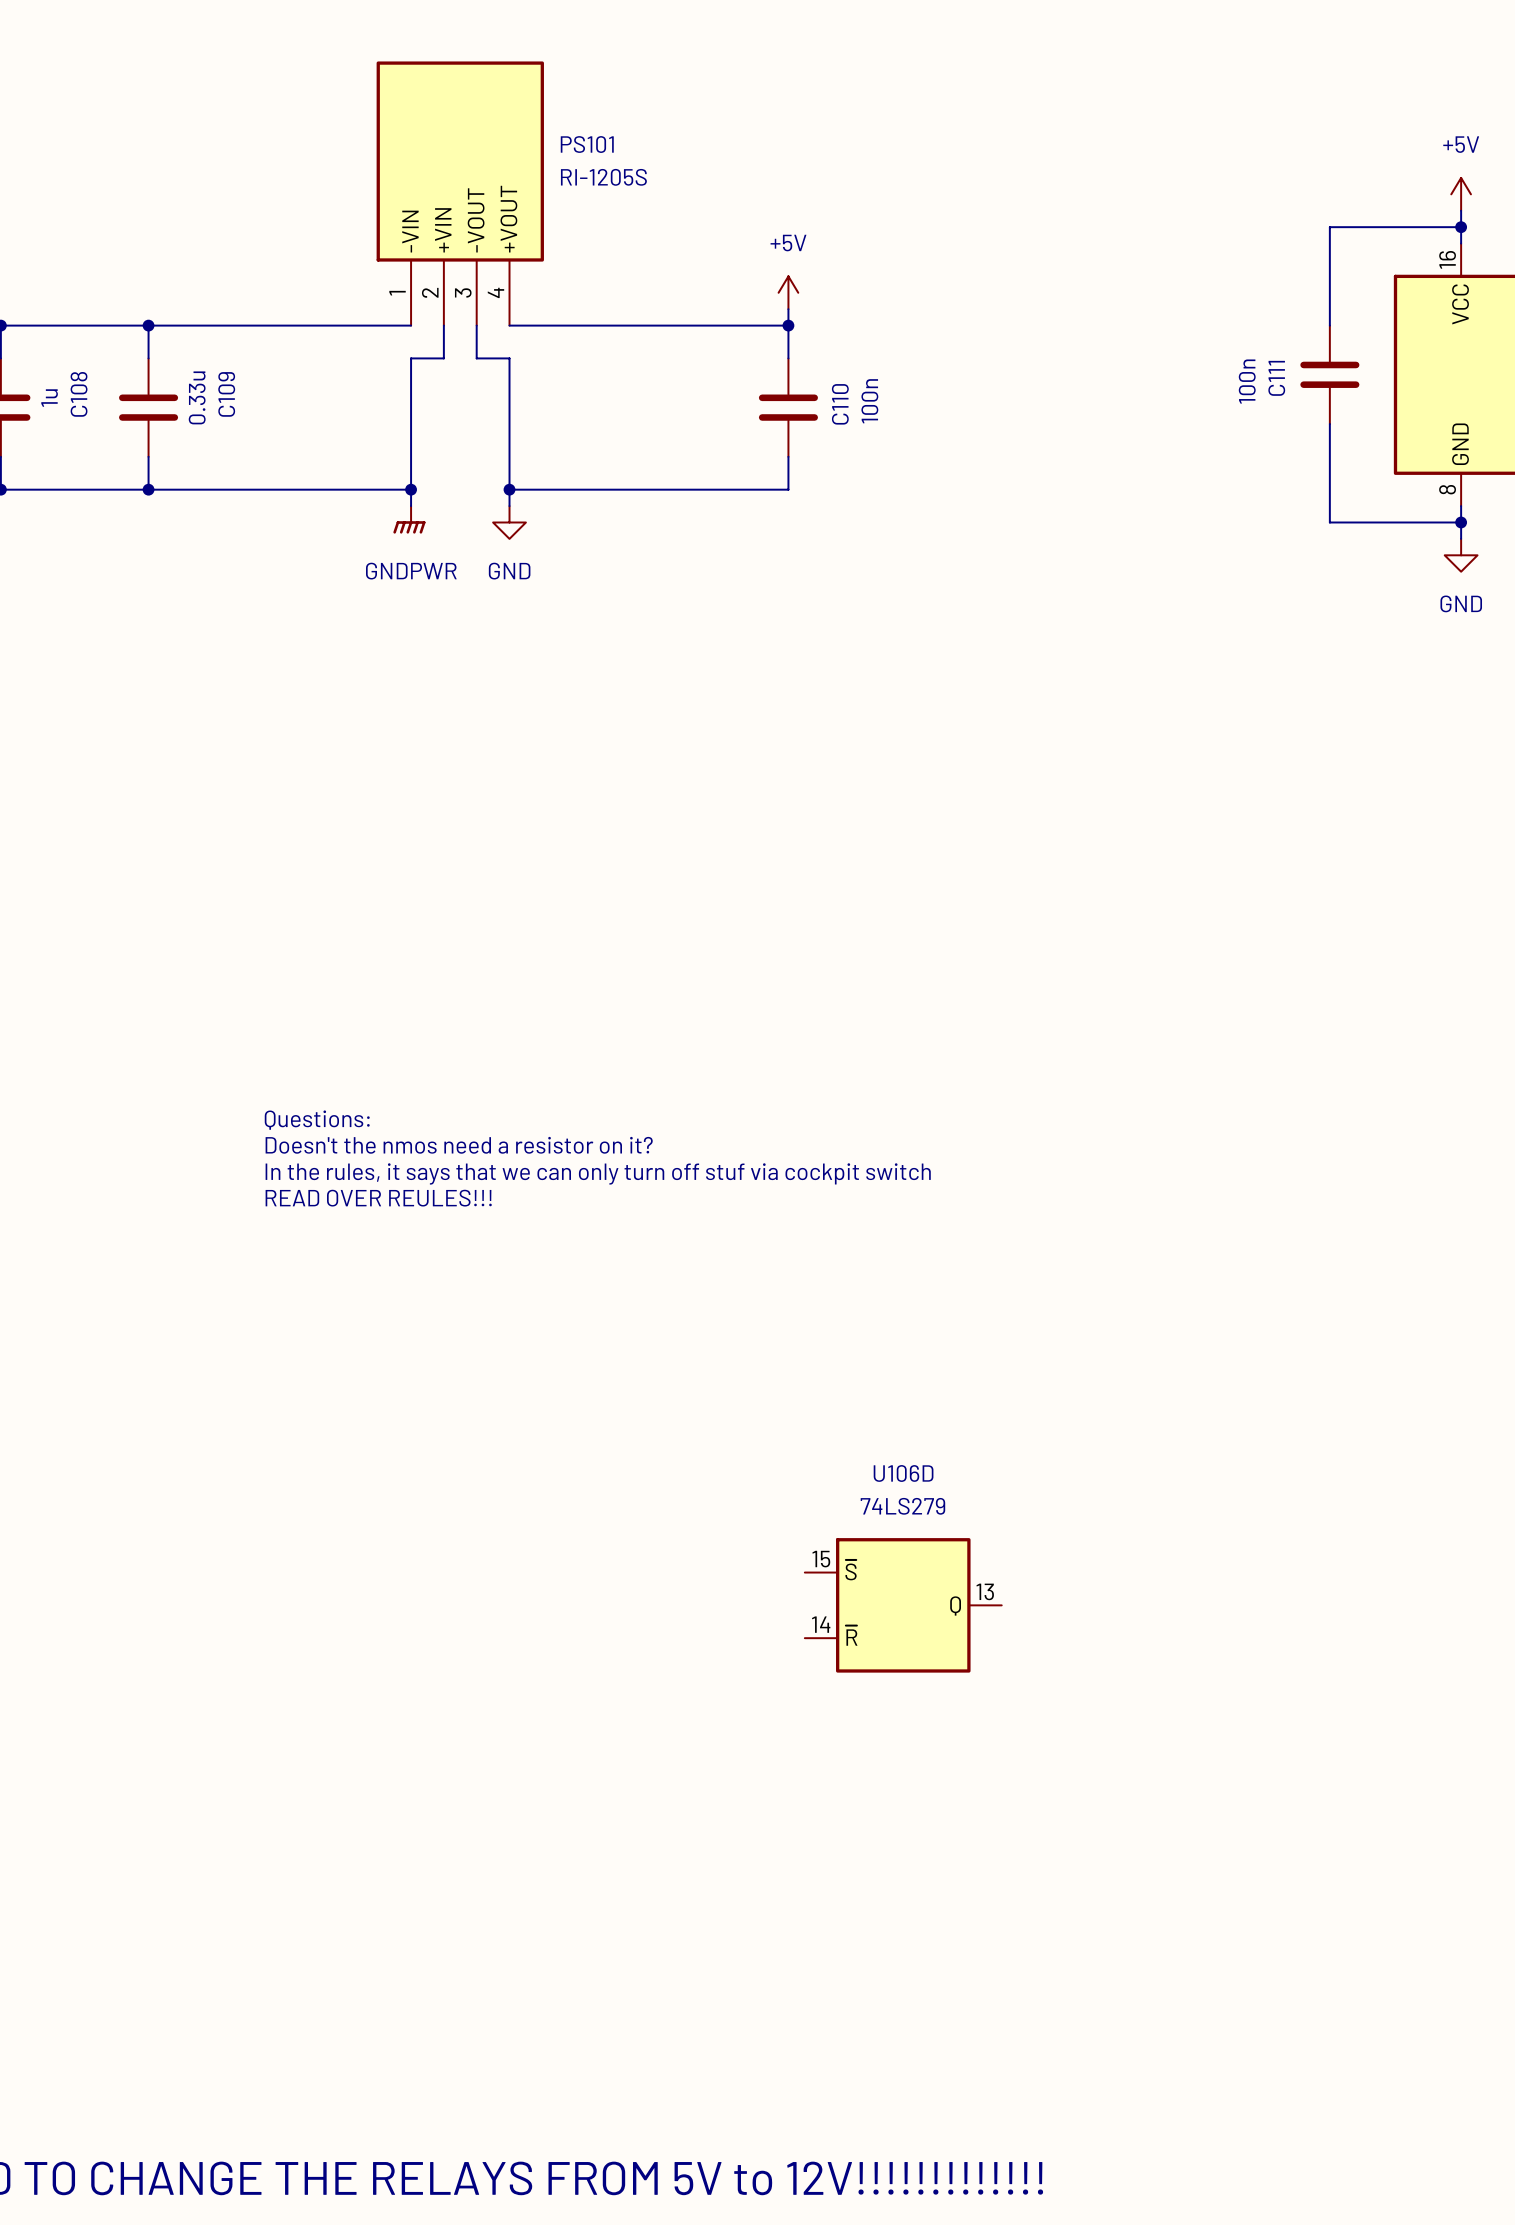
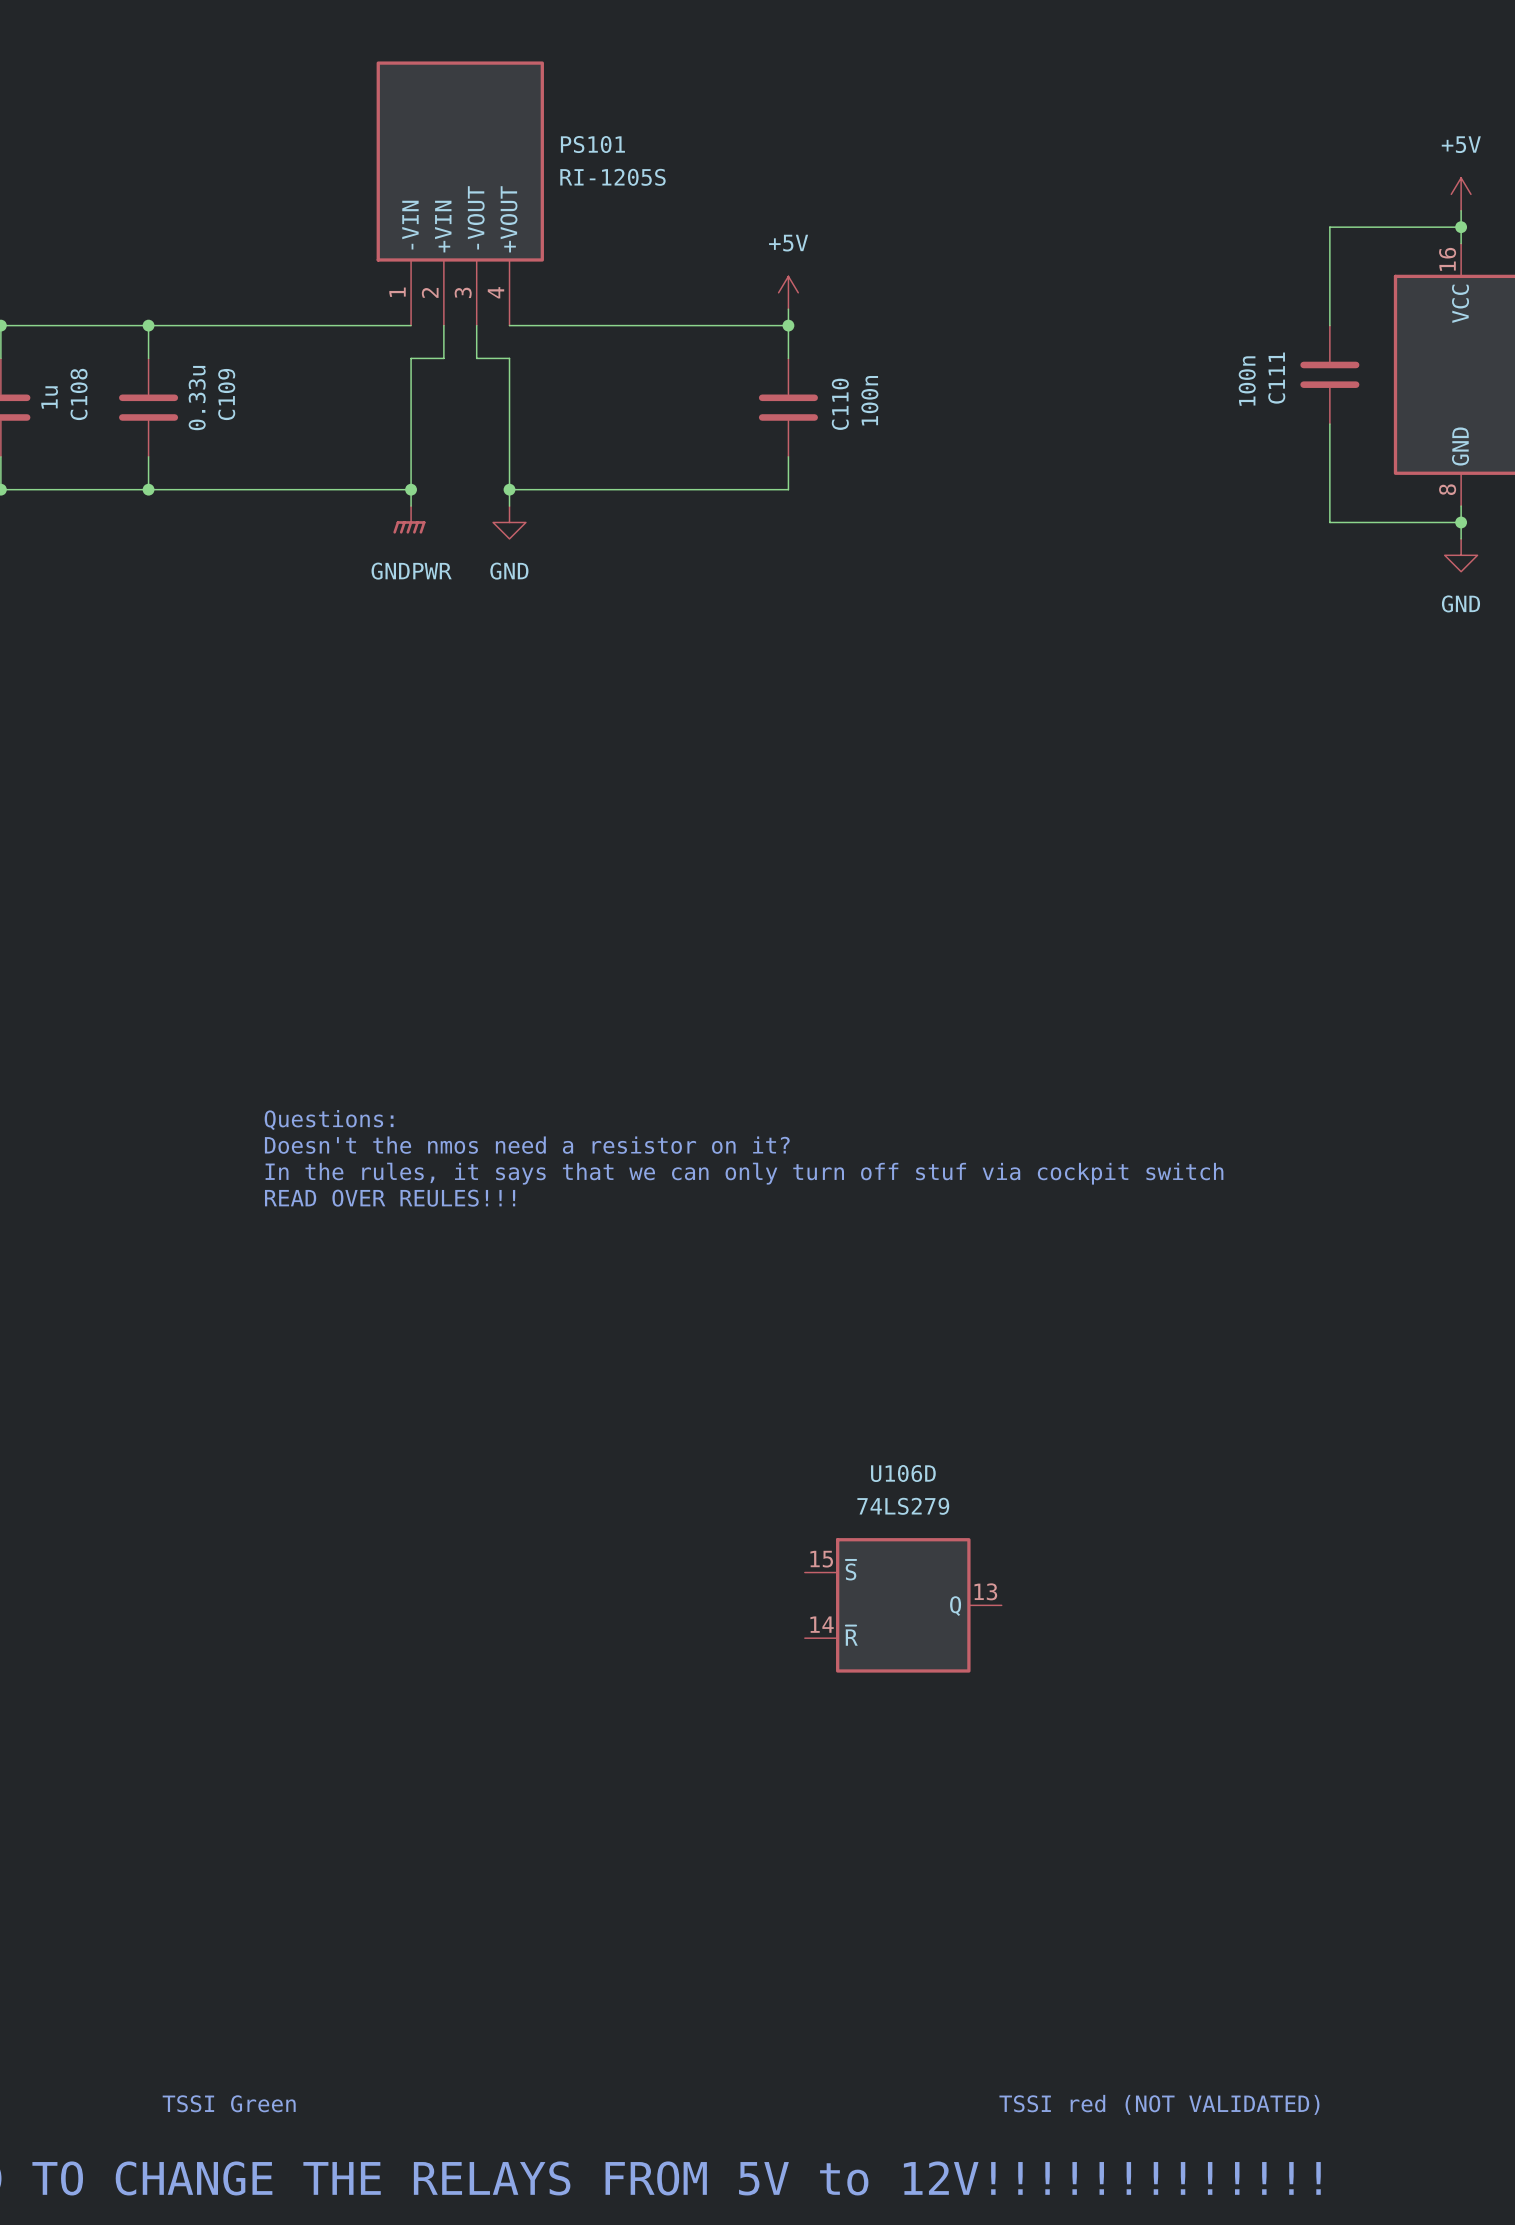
text: none -> TSSI Green (229, 2103)
text: none -> TSSI red (NOT VALIDATED) (1159, 2104)

